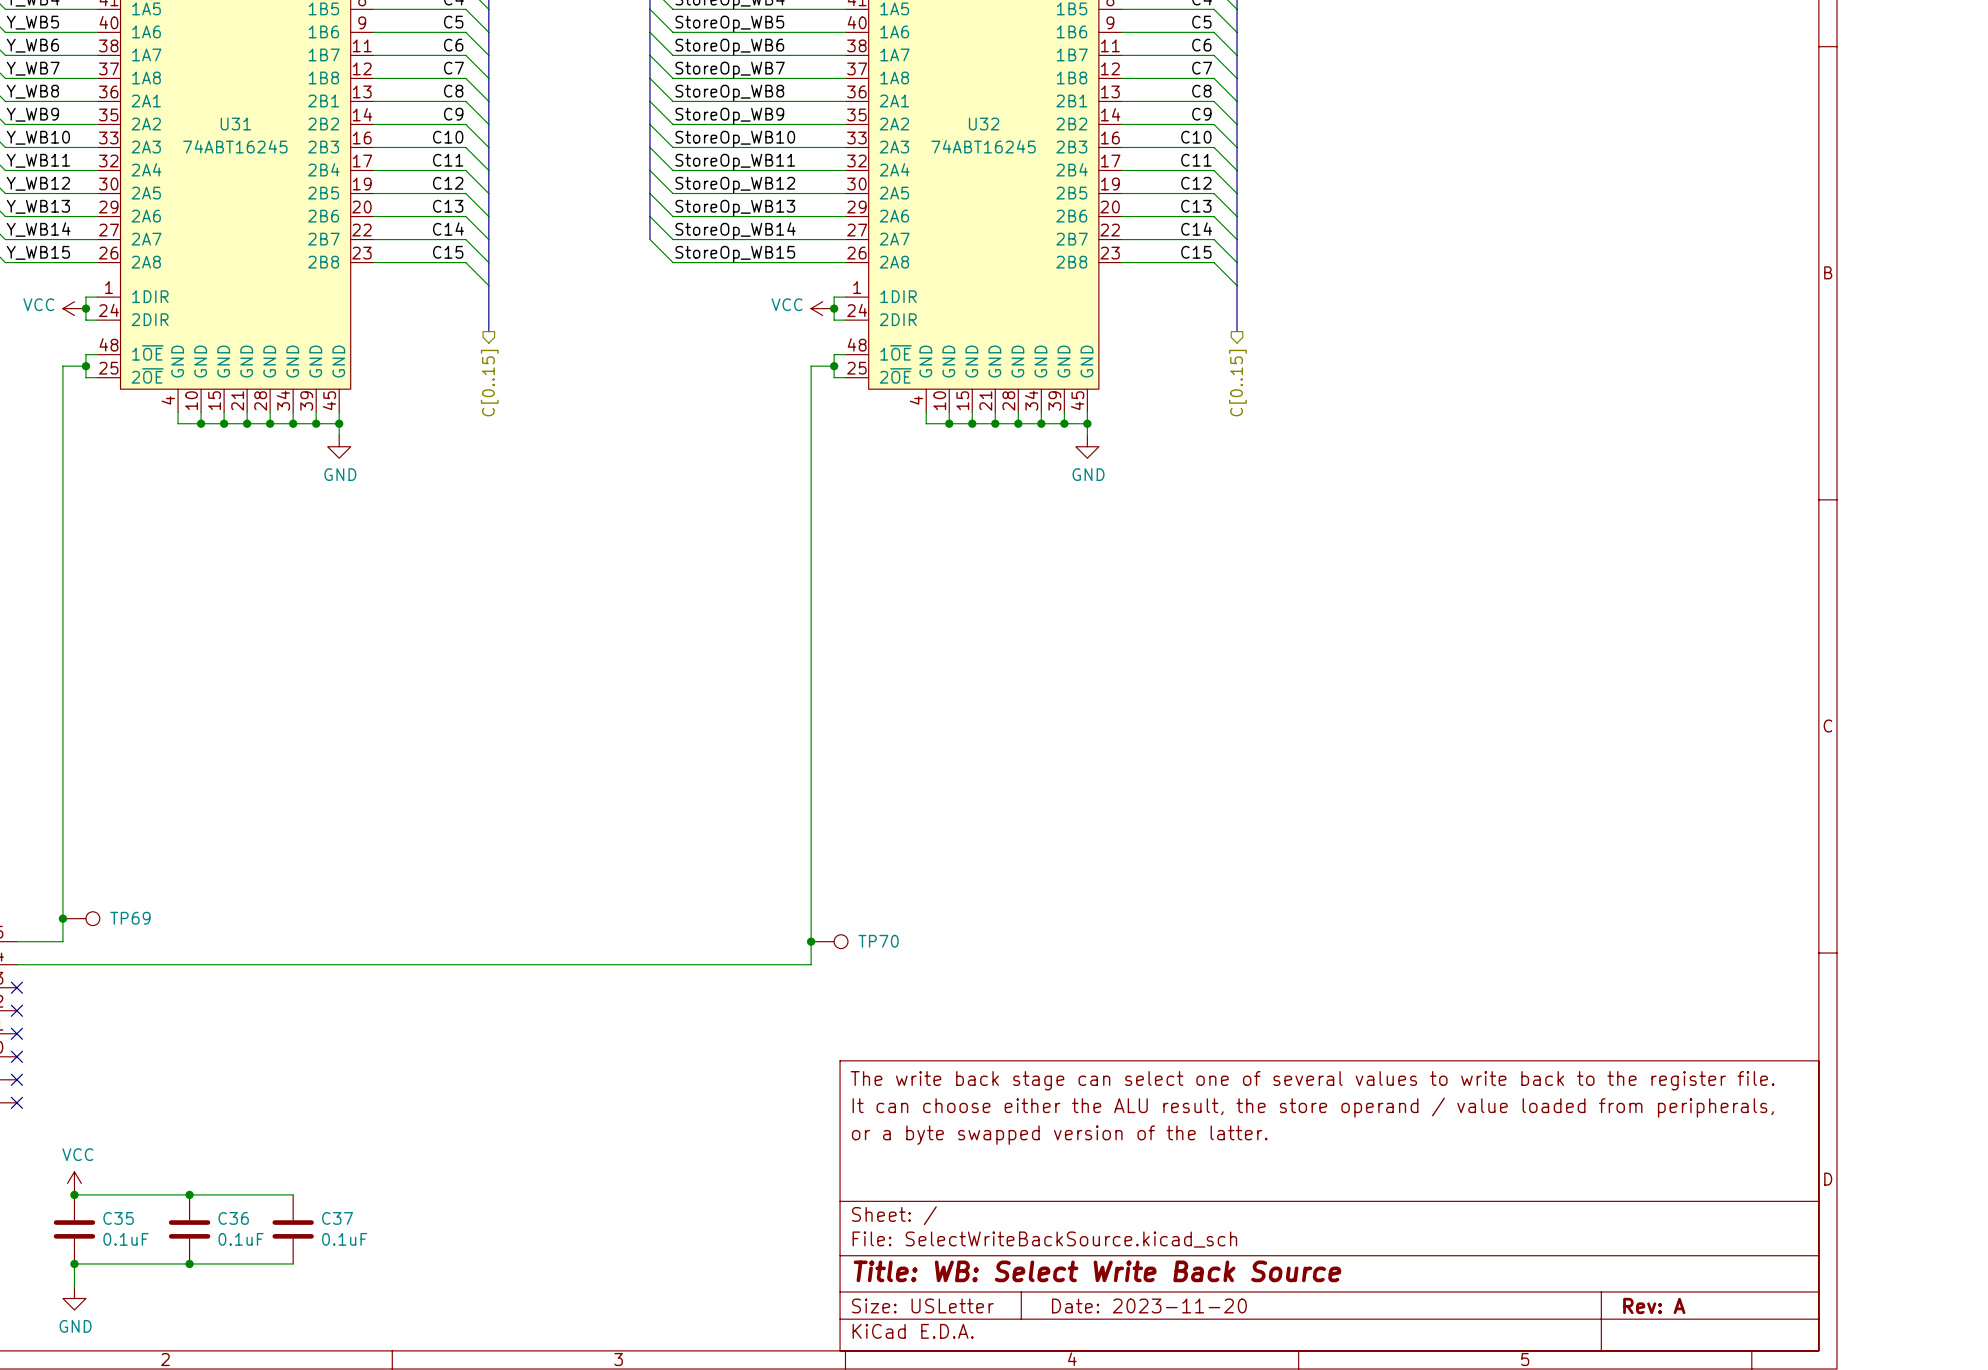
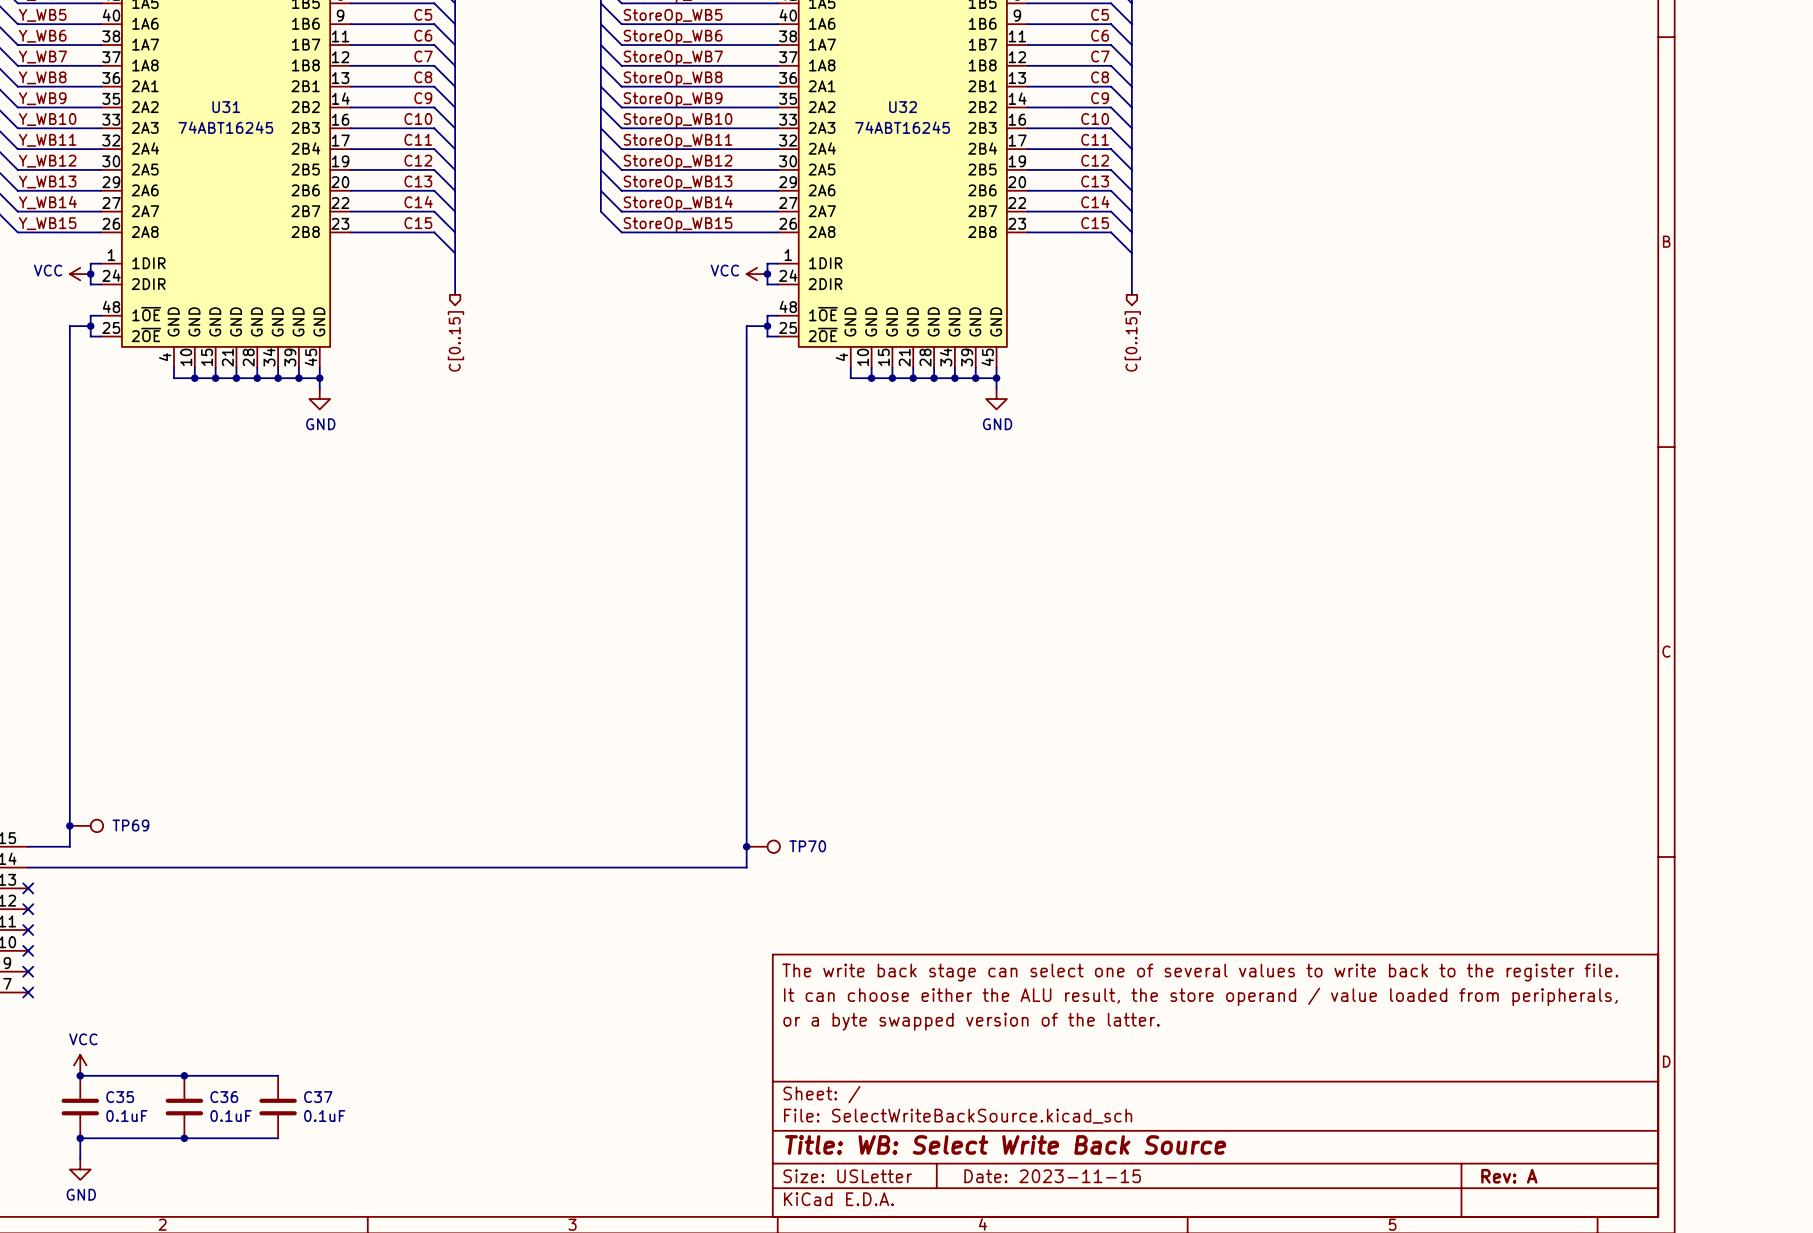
title block: Date: 2023-11-20 (1149, 1305) -> Date: 2023-11-15 (1052, 1176)

